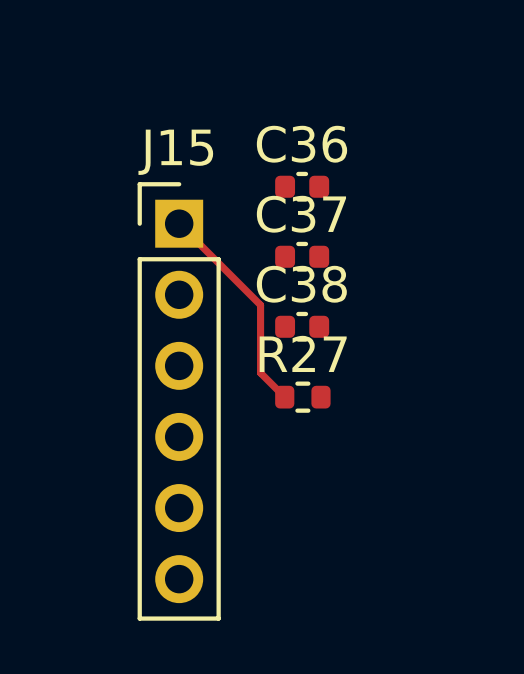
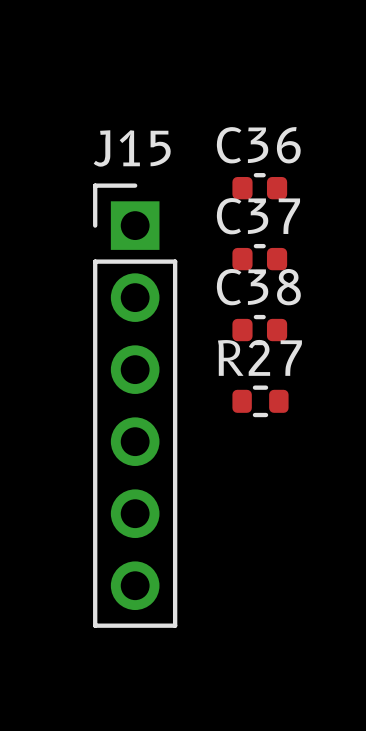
track: (179, 223) (260, 305) (260, 372) (284, 397) -> none

